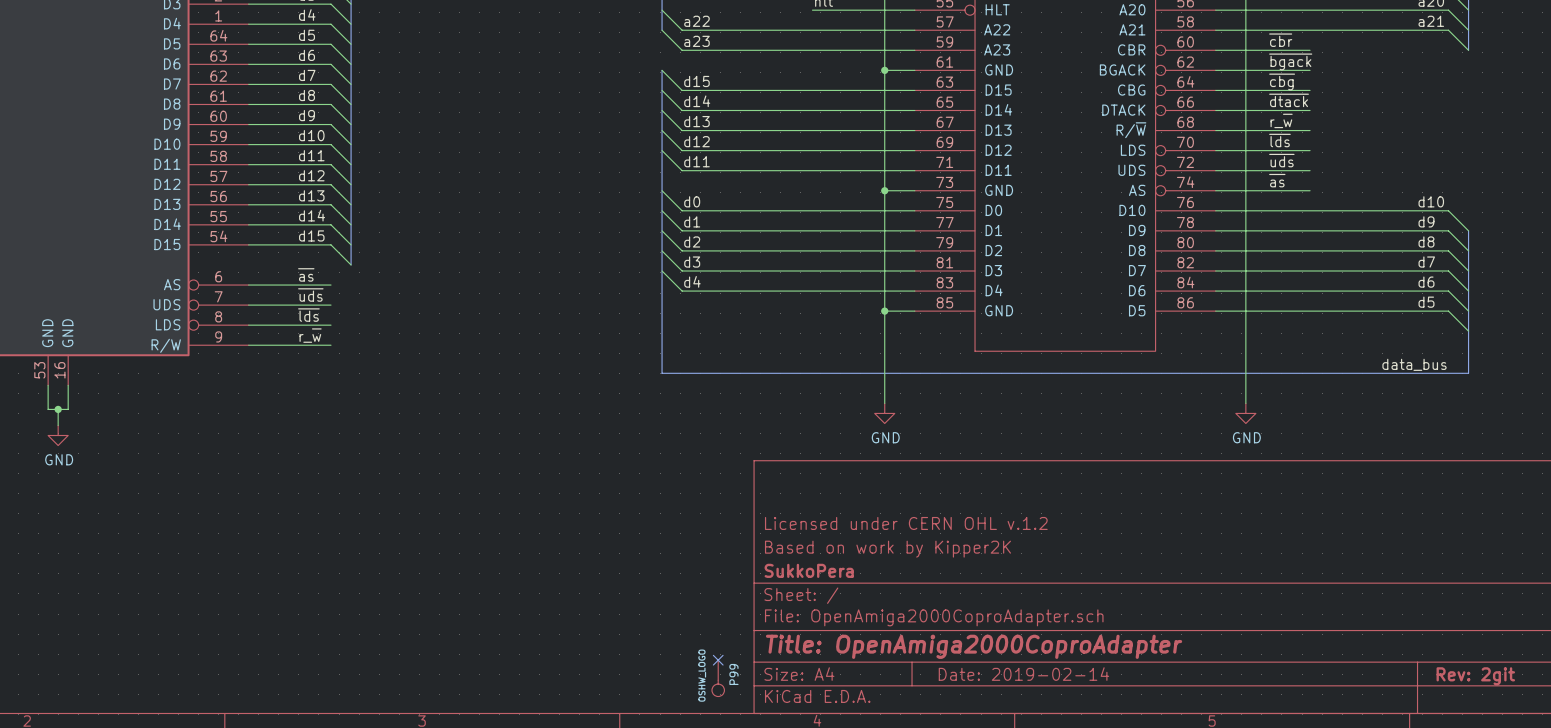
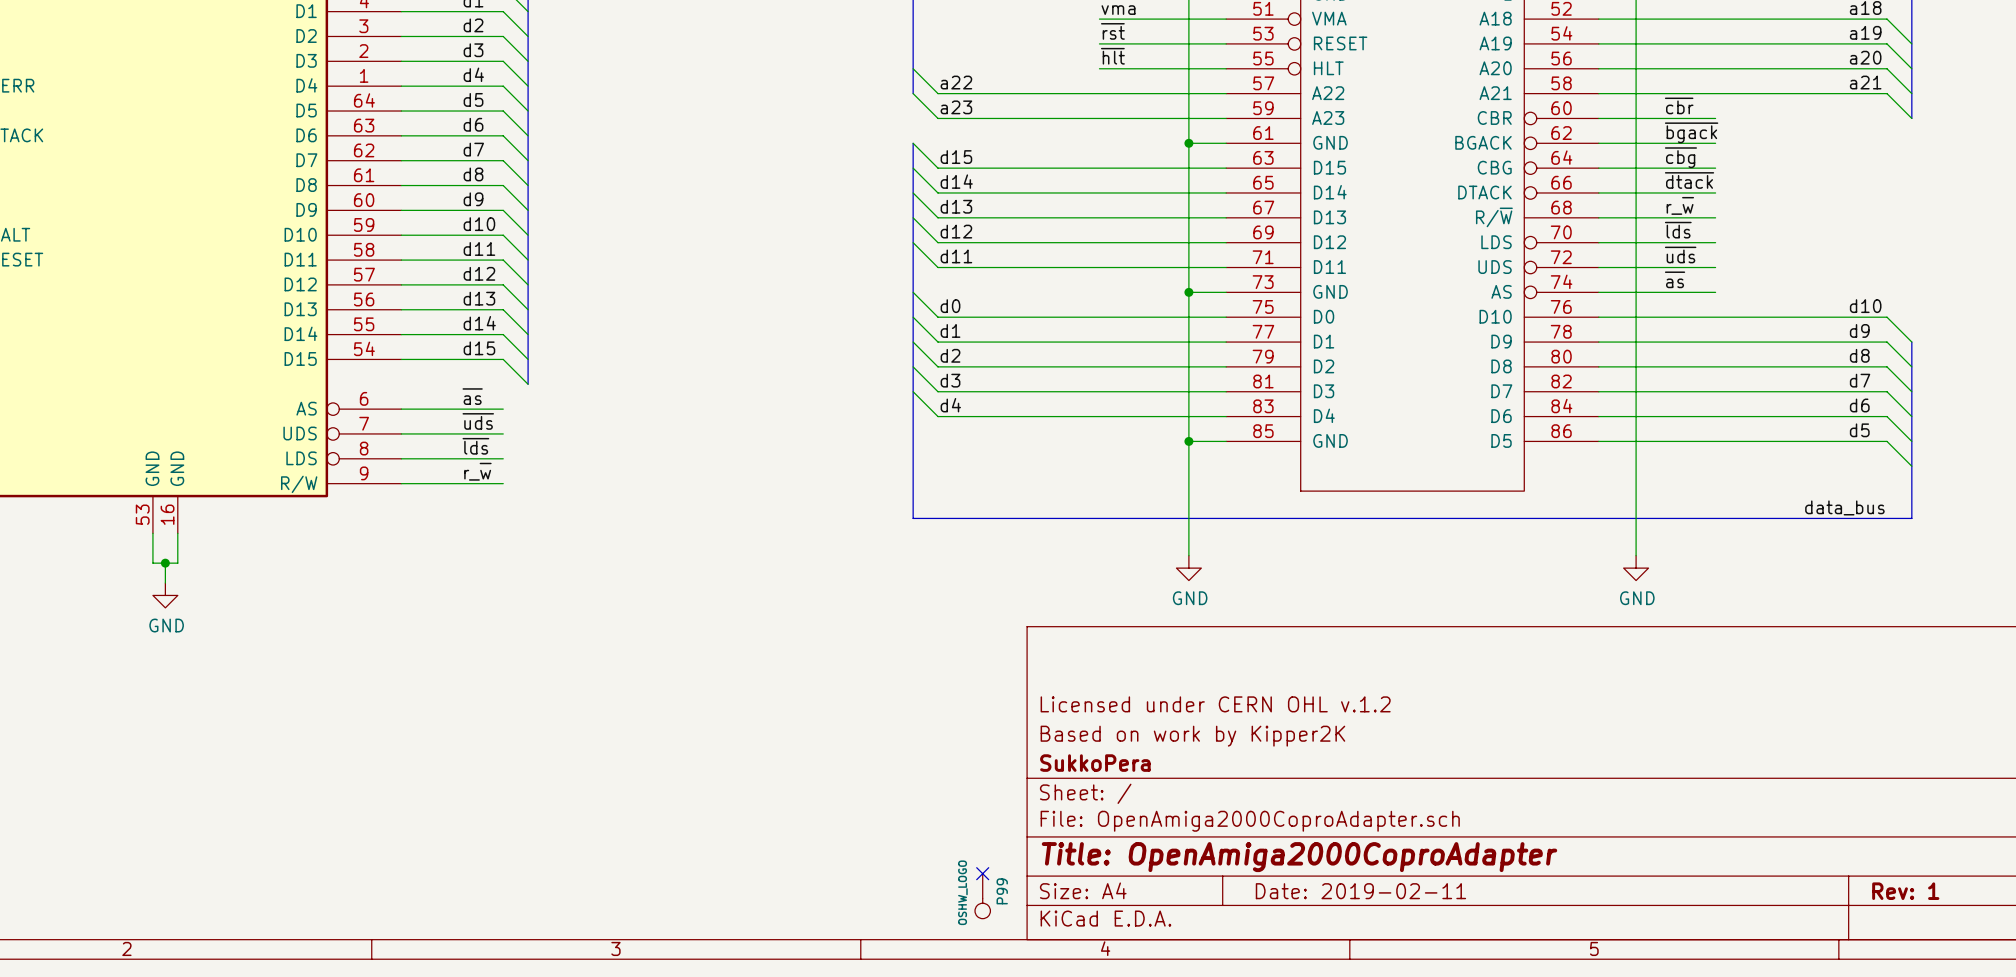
title block: Date: 2019-02-14 (1023, 674) -> Date: 2019-02-11 (1360, 891)
title block: Rev: 2git (1475, 676) -> Rev: 1 (1905, 891)

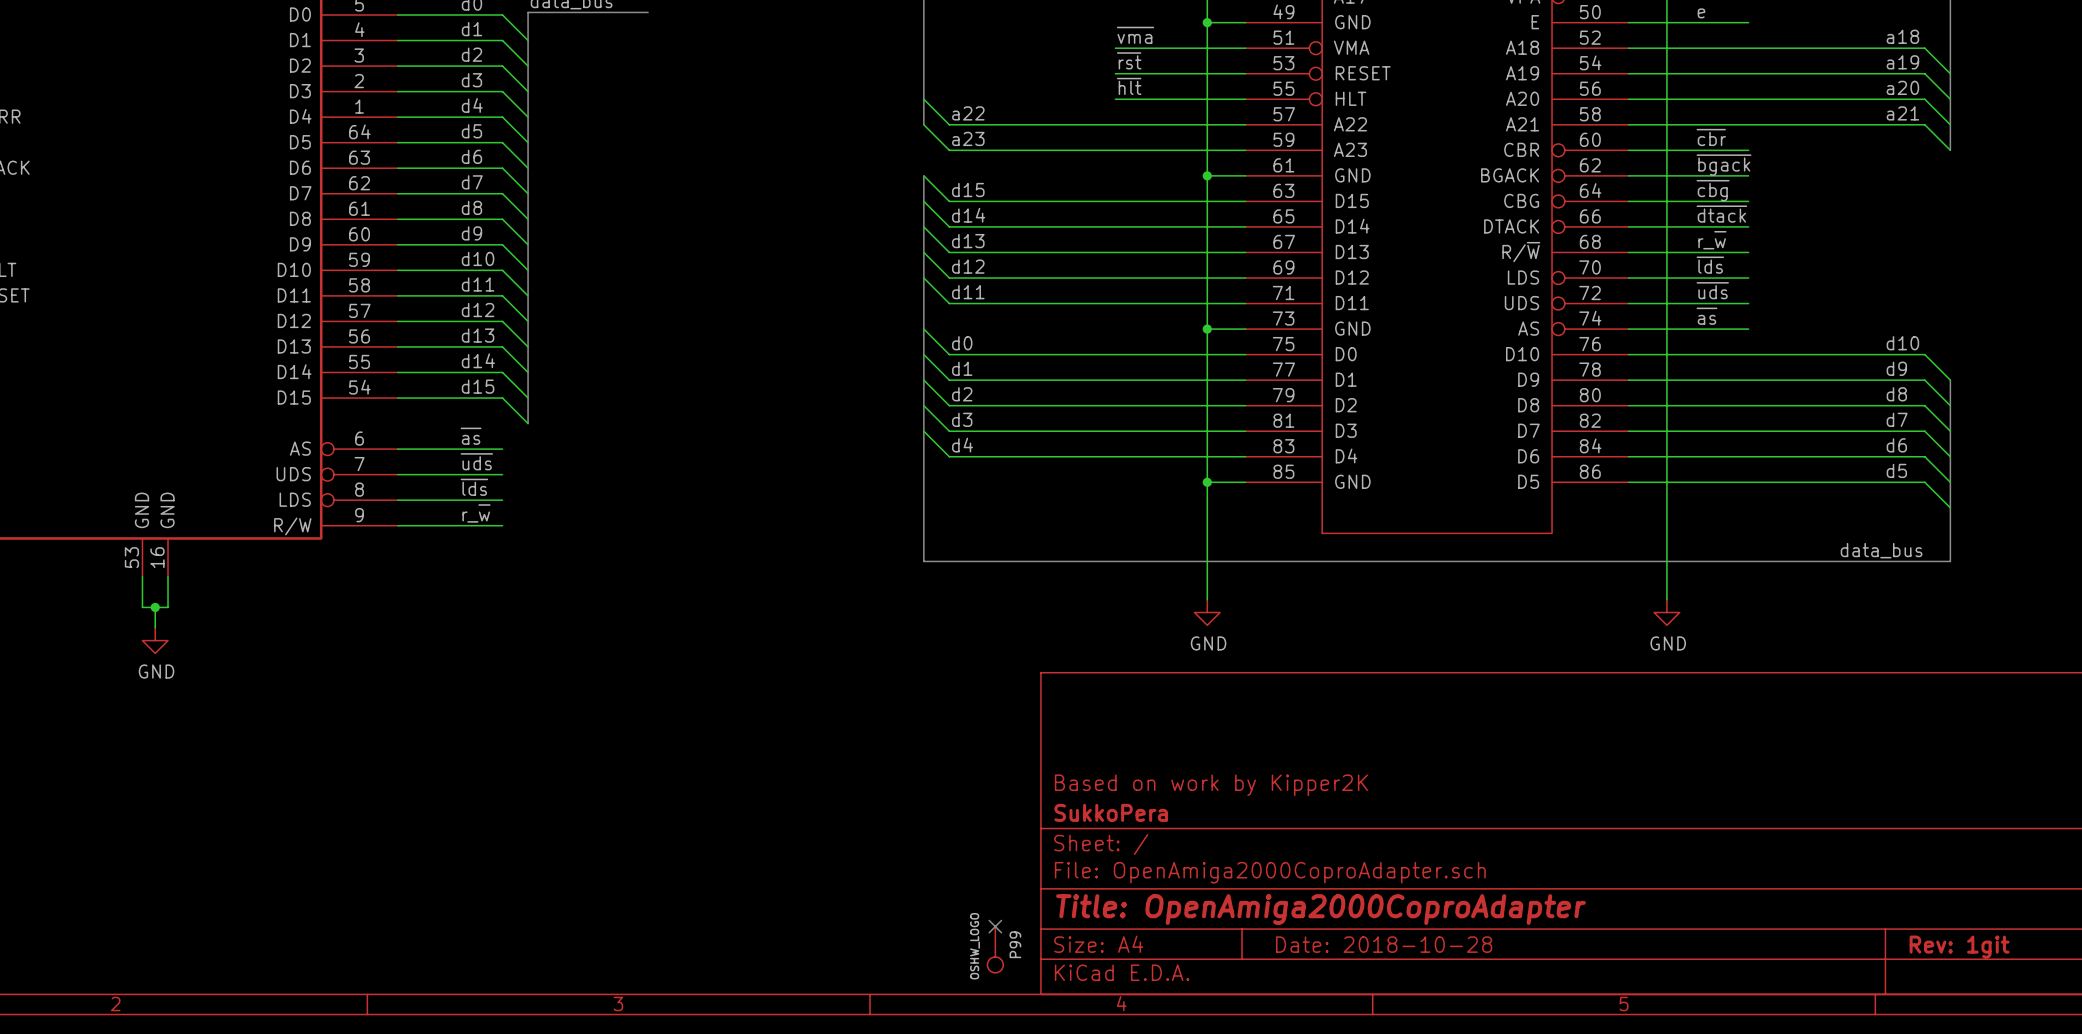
title block: Licensed under CERN OHL v.1.2 (1215, 704) -> none
title block: Date: 2019-02-11 (1360, 891) -> Date: 2018-10-28 (1384, 944)
title block: Rev: 1 (1905, 891) -> Rev: 1git (1959, 947)

